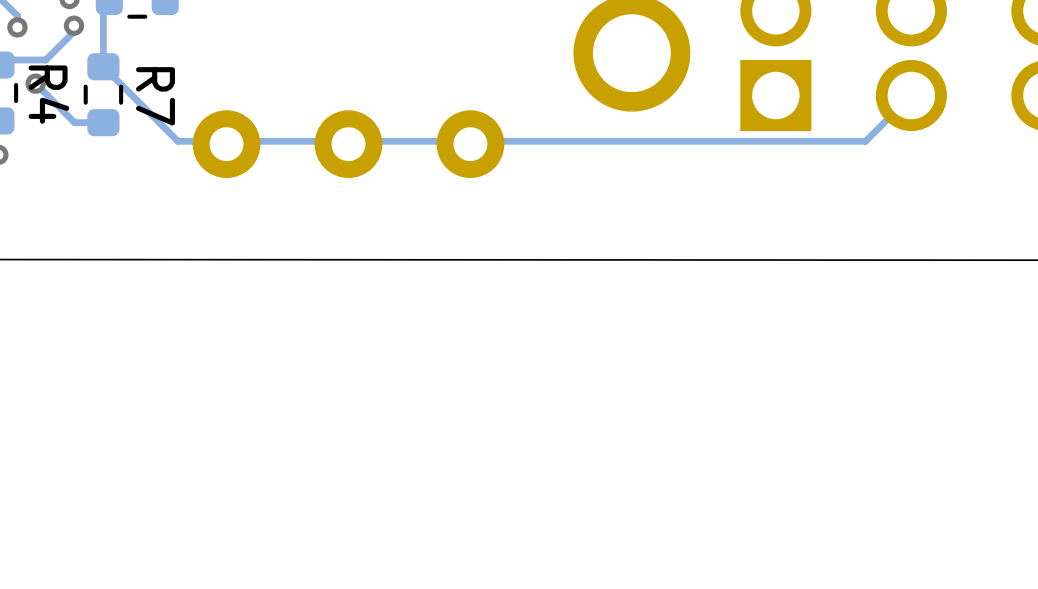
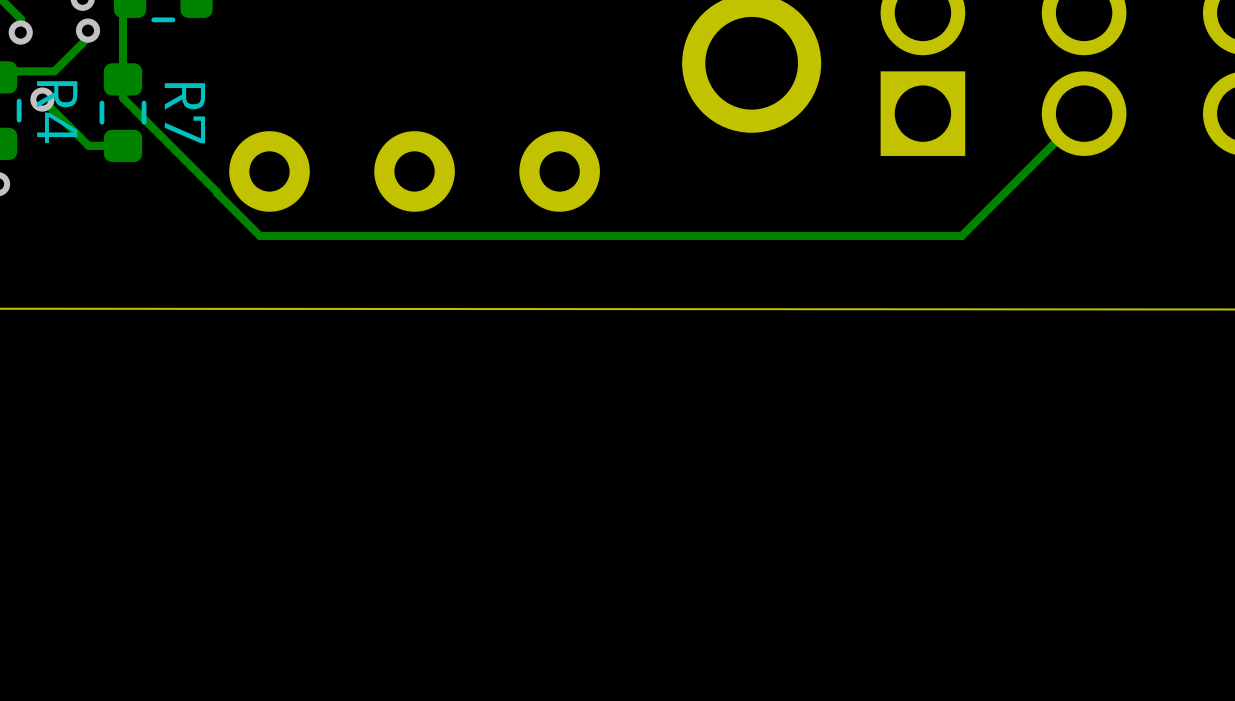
track: (103, 66) (177, 141) (865, 141) -> (123, 79) (123, 98) (259, 235) (961, 235) (1029, 168)

